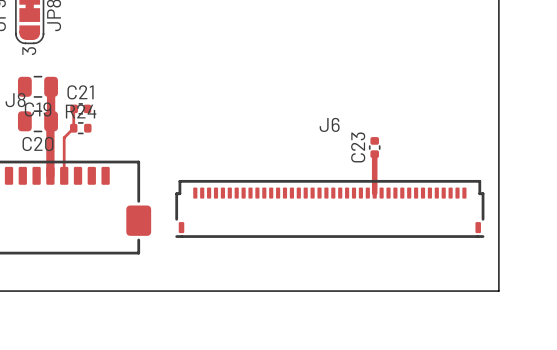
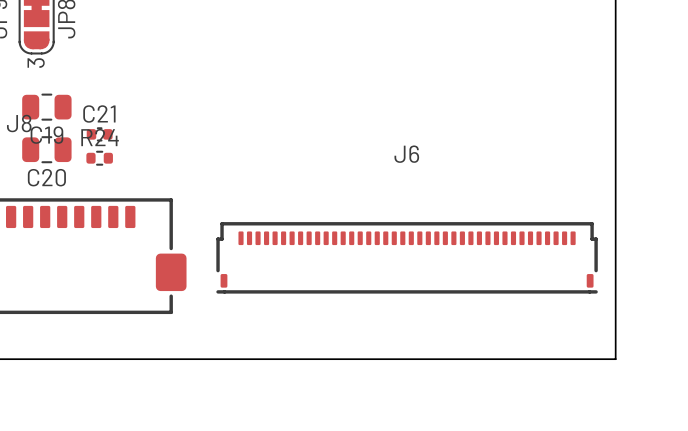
top track: (51, 86) (50, 175) -> none
top track: (74, 108) (73, 128) (64, 137) (64, 175) -> none
C23: (374, 147) -> none
top track: (374, 154) (374, 193) -> none

